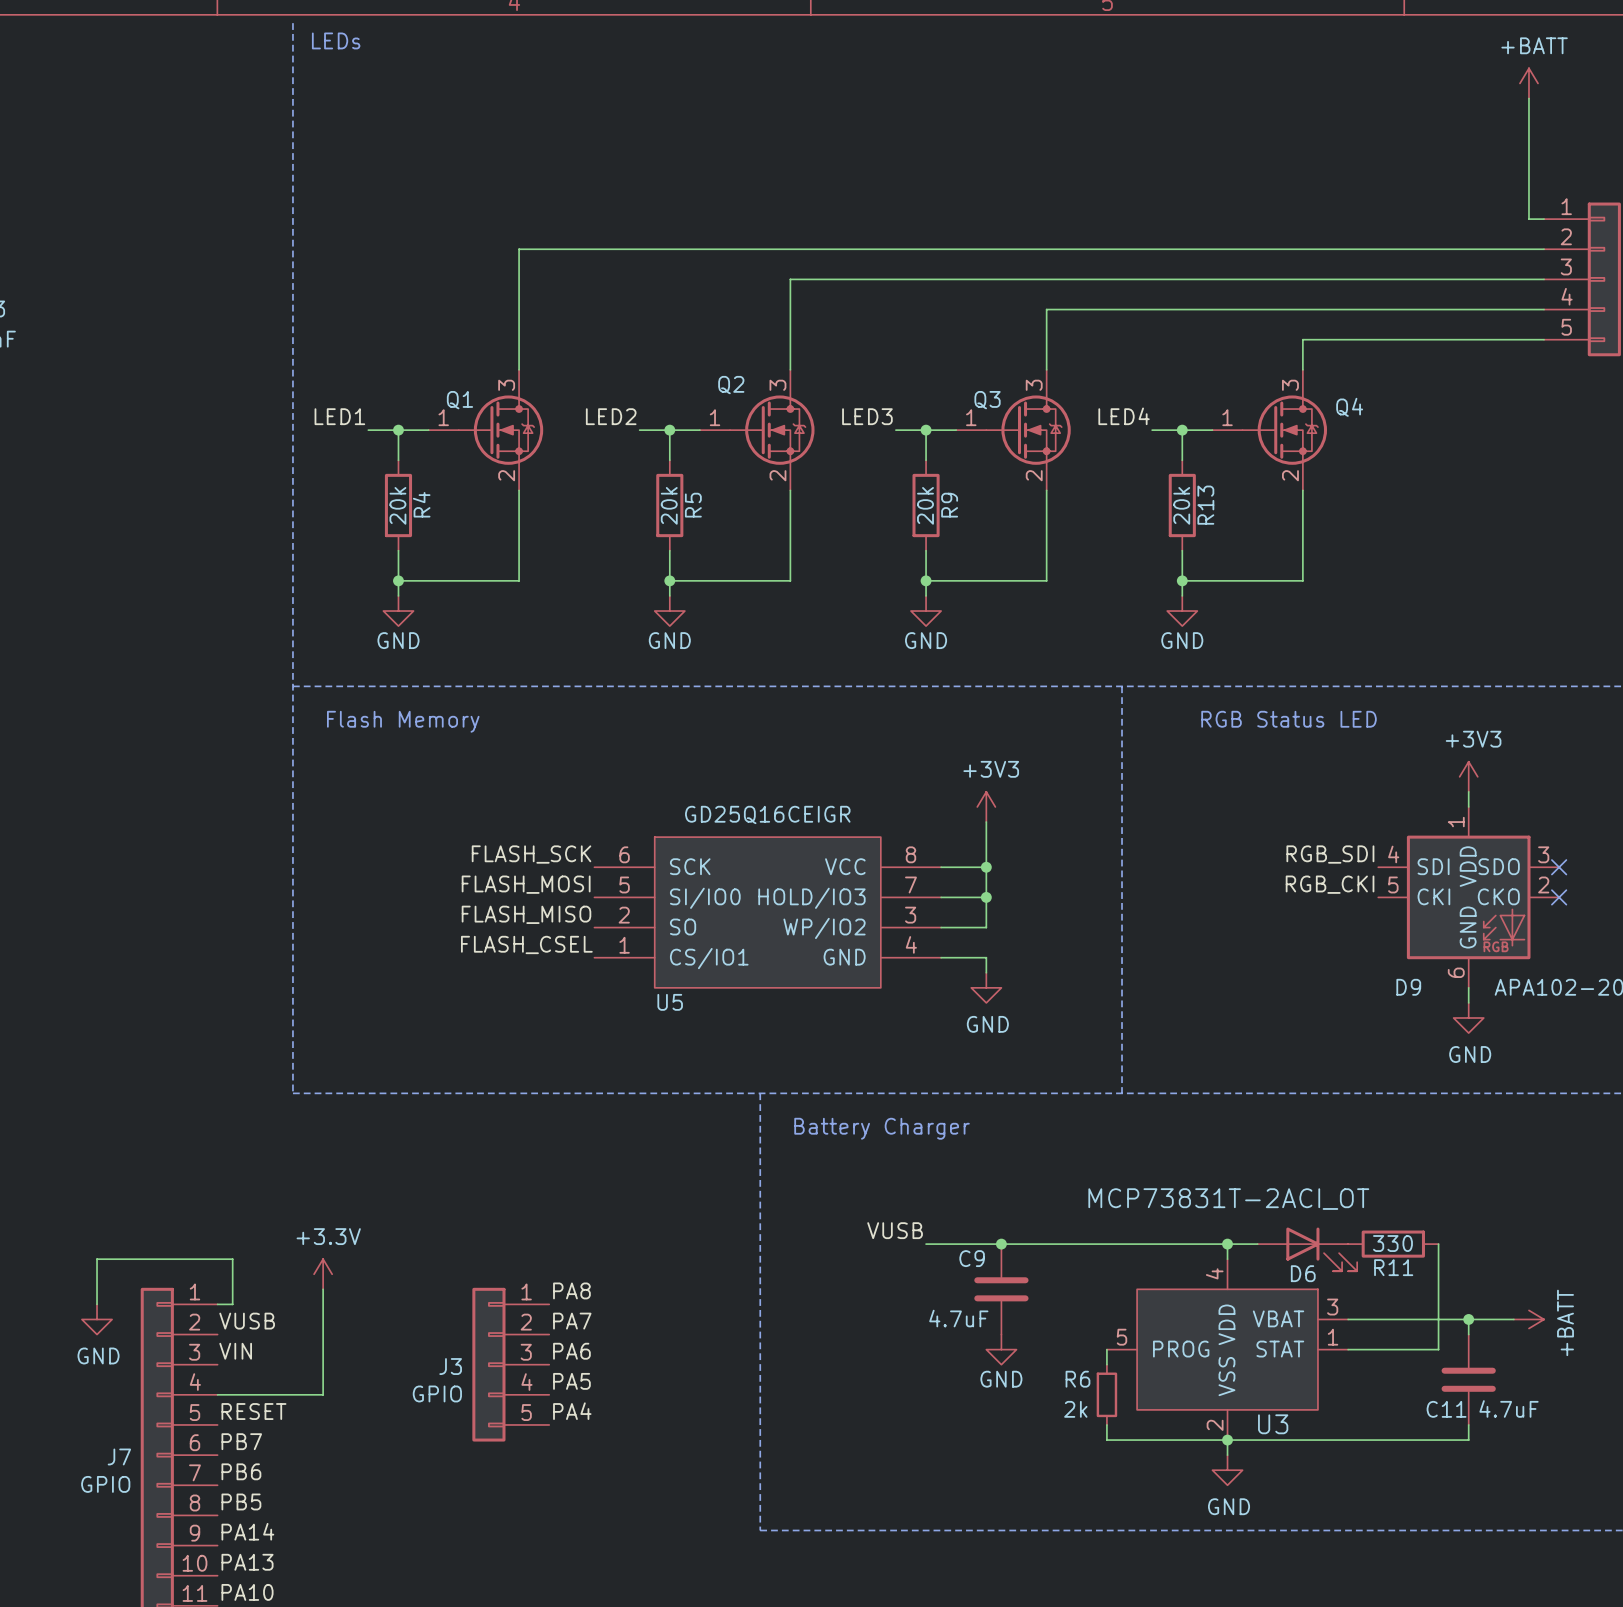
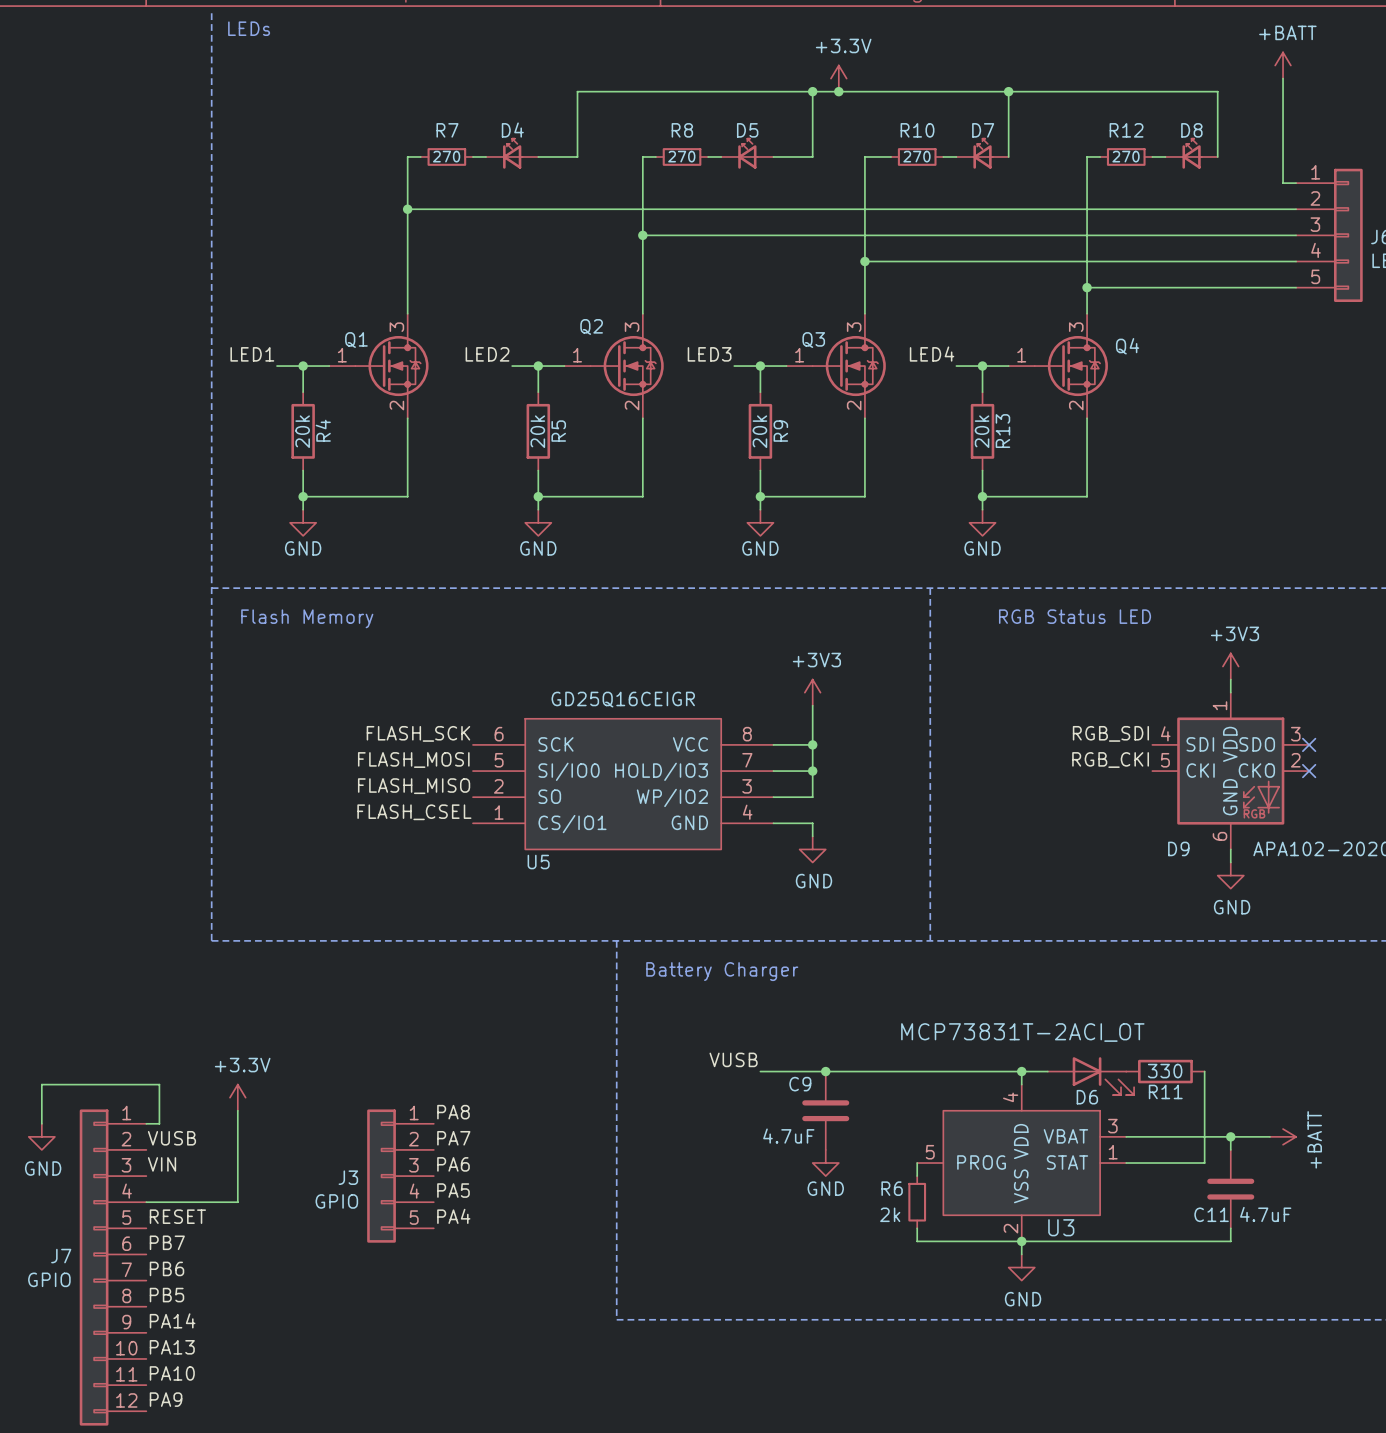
power symbol: none -> +3.3V (838, 78)
wire: none -> (812, 91) (812, 156) (773, 156)
junction: none -> (812, 91)
junction: none -> (838, 91)
wire: none -> (1008, 91) (1008, 156)
junction: none -> (1008, 91)
D4: none -> (512, 153)
D5: none -> (747, 153)
D7: none -> (982, 153)
D8: none -> (1191, 153)
wire: none -> (420, 156) (407, 156) (407, 209)
R7: none -> 270 (446, 156)
wire: none -> (472, 156) (486, 156)
wire: none -> (538, 156) (577, 156) (577, 91) (1217, 91) (1217, 156)
wire: none -> (655, 156) (642, 156) (642, 235)
R8: none -> 270 (682, 156)
wire: none -> (708, 156) (721, 156)
wire: none -> (891, 156) (864, 156) (864, 261)
R10: none -> 270 (917, 156)
wire: none -> (943, 156) (956, 156)
wire: none -> (1100, 156) (1087, 156) (1087, 287)
R12: none -> 270 (1126, 156)
wire: none -> (1152, 156) (1165, 156)
junction: none -> (407, 209)
junction: none -> (642, 235)
junction: none -> (864, 261)
junction: none -> (1087, 287)

